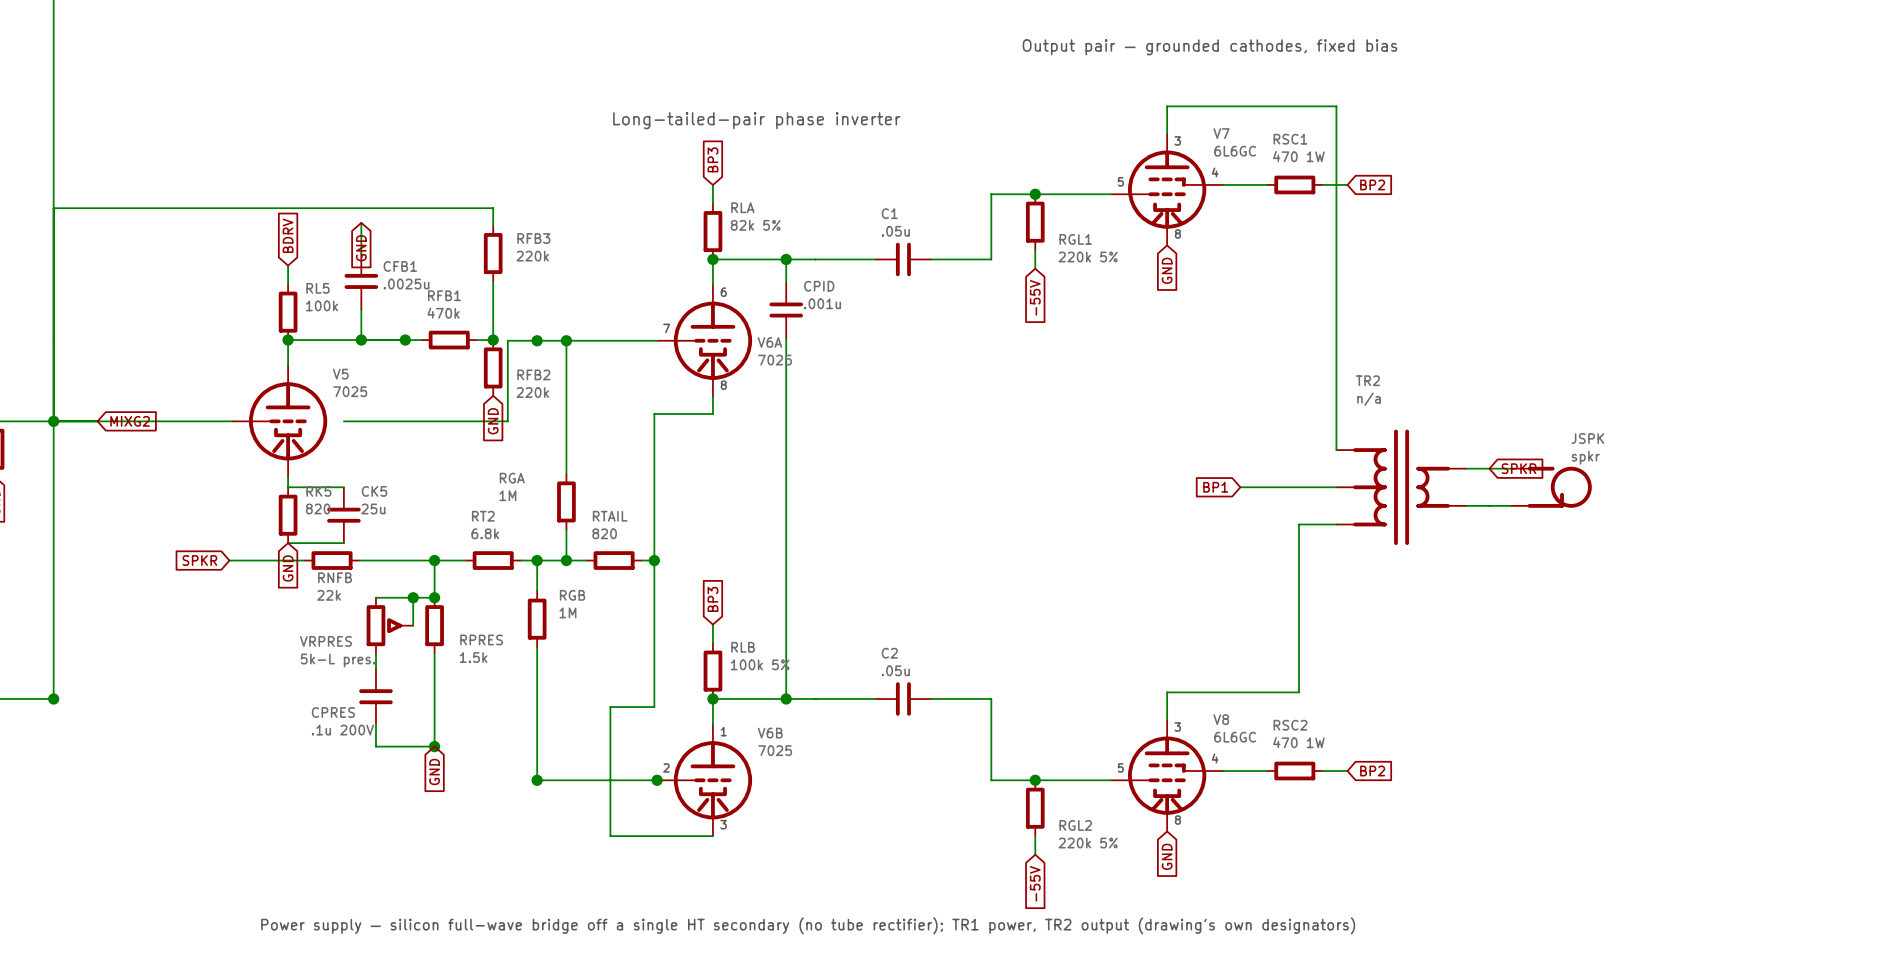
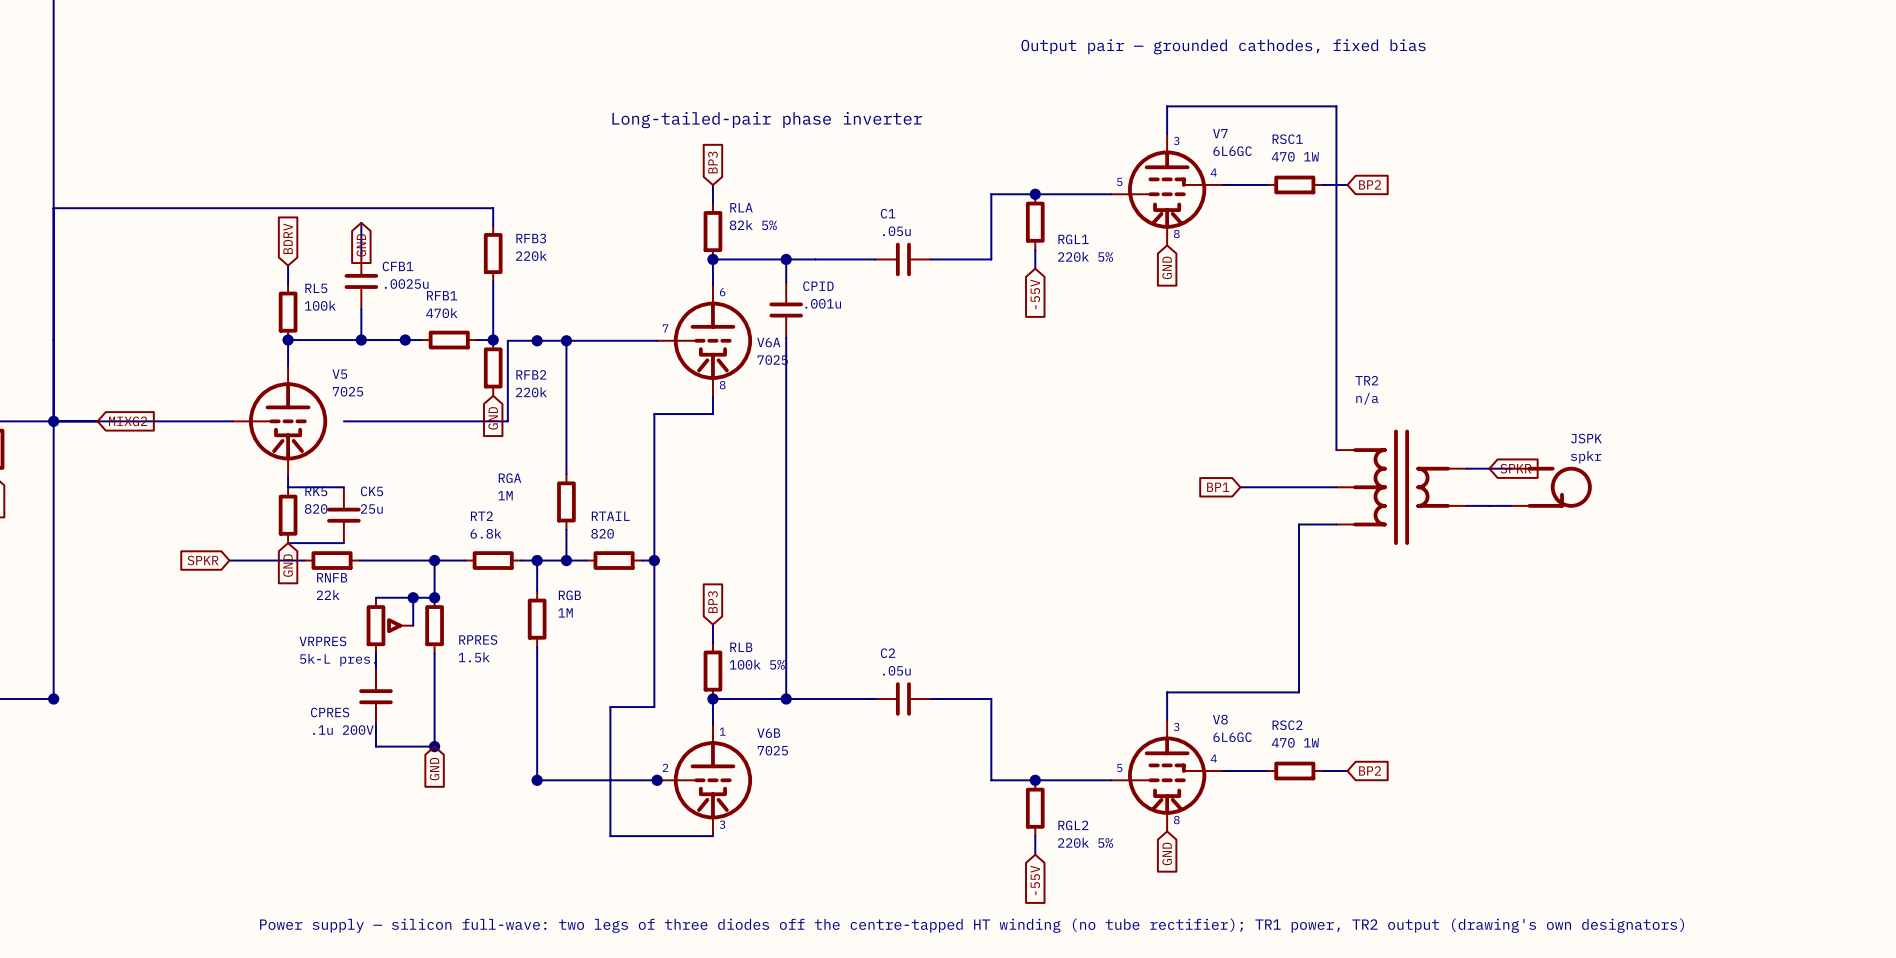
text: Power supply — silicon full-wave bridge off a single HT secondary (no tube rectifier); TR1 power, TR2 output (drawing's own designators) (808, 925) -> Power supply — silicon full-wave: two legs of three diodes off the centre-tapped HT winding (no tube rectifier); TR1 power, TR2 output (drawing's own designators) (972, 925)

